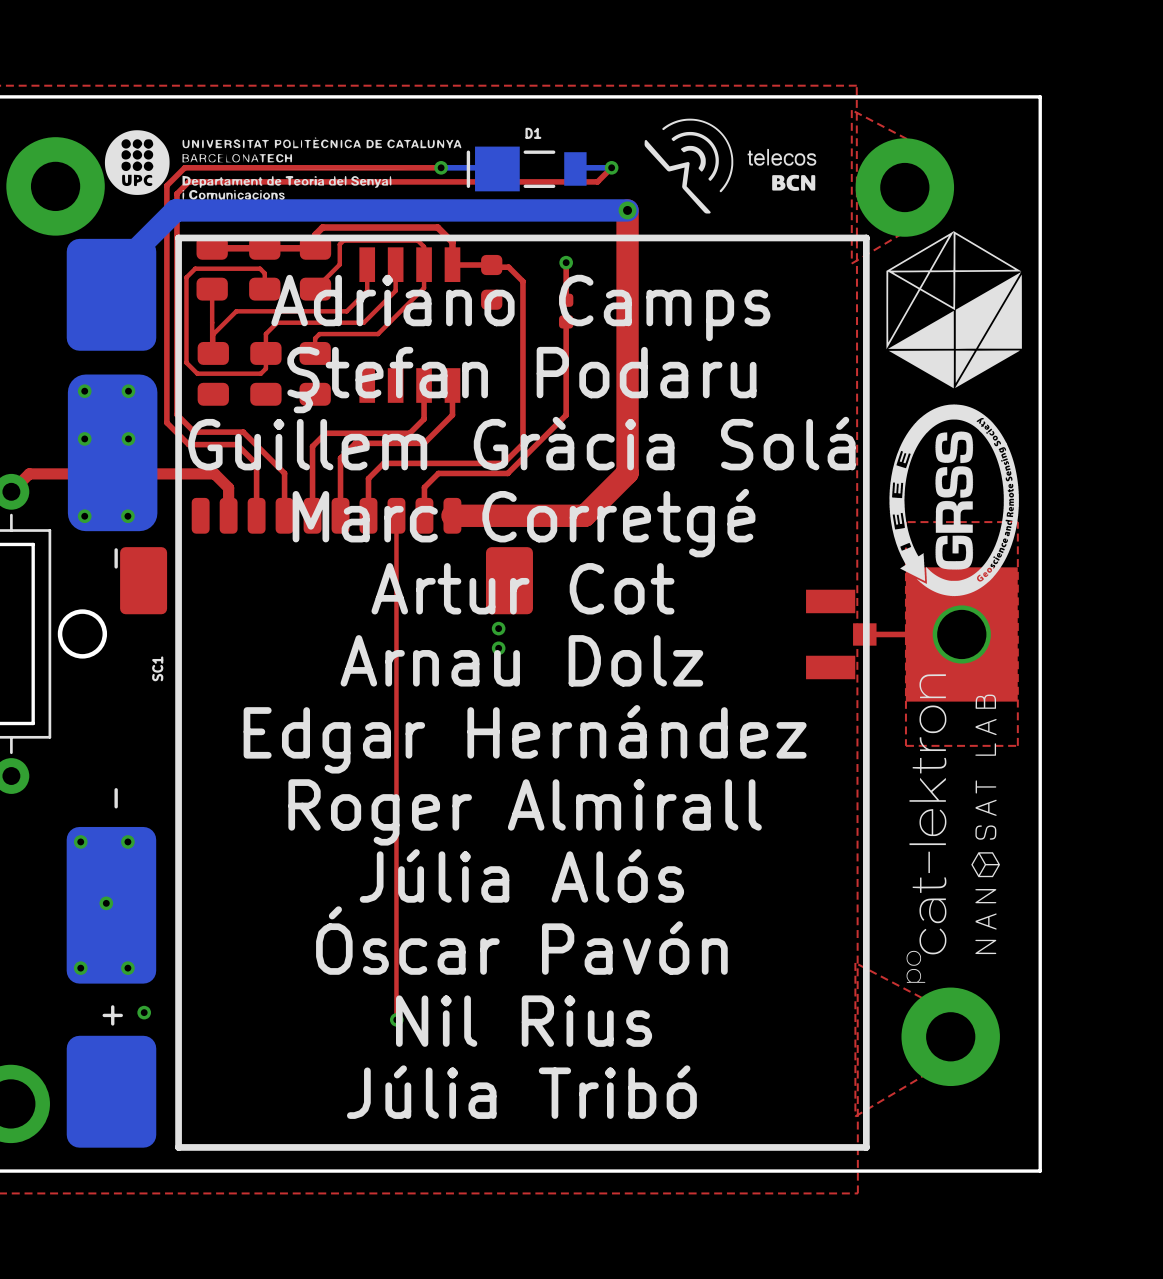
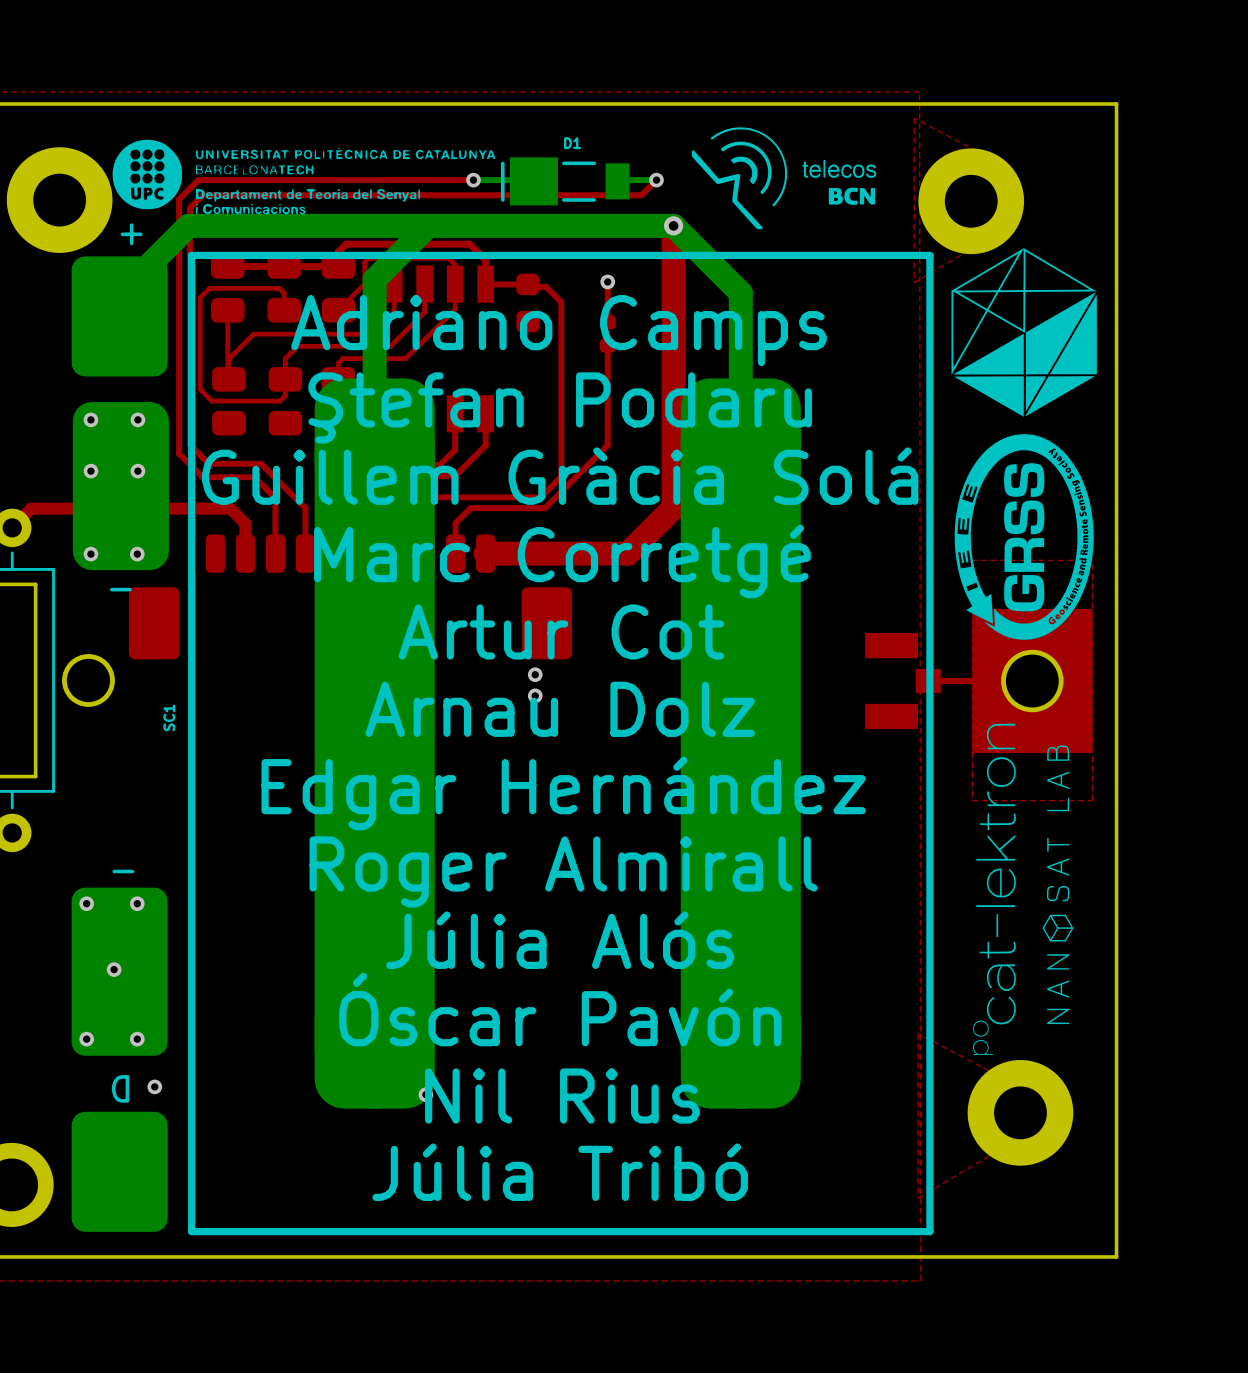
bottom track: none -> (428, 225) (374, 279) (374, 1048)
bottom track: none -> (673, 225) (740, 293) (740, 1048)
text: none -> + (131, 234)
SC1 footprint: [66, 234, 870, 1151] -> [71, 251, 934, 1236]

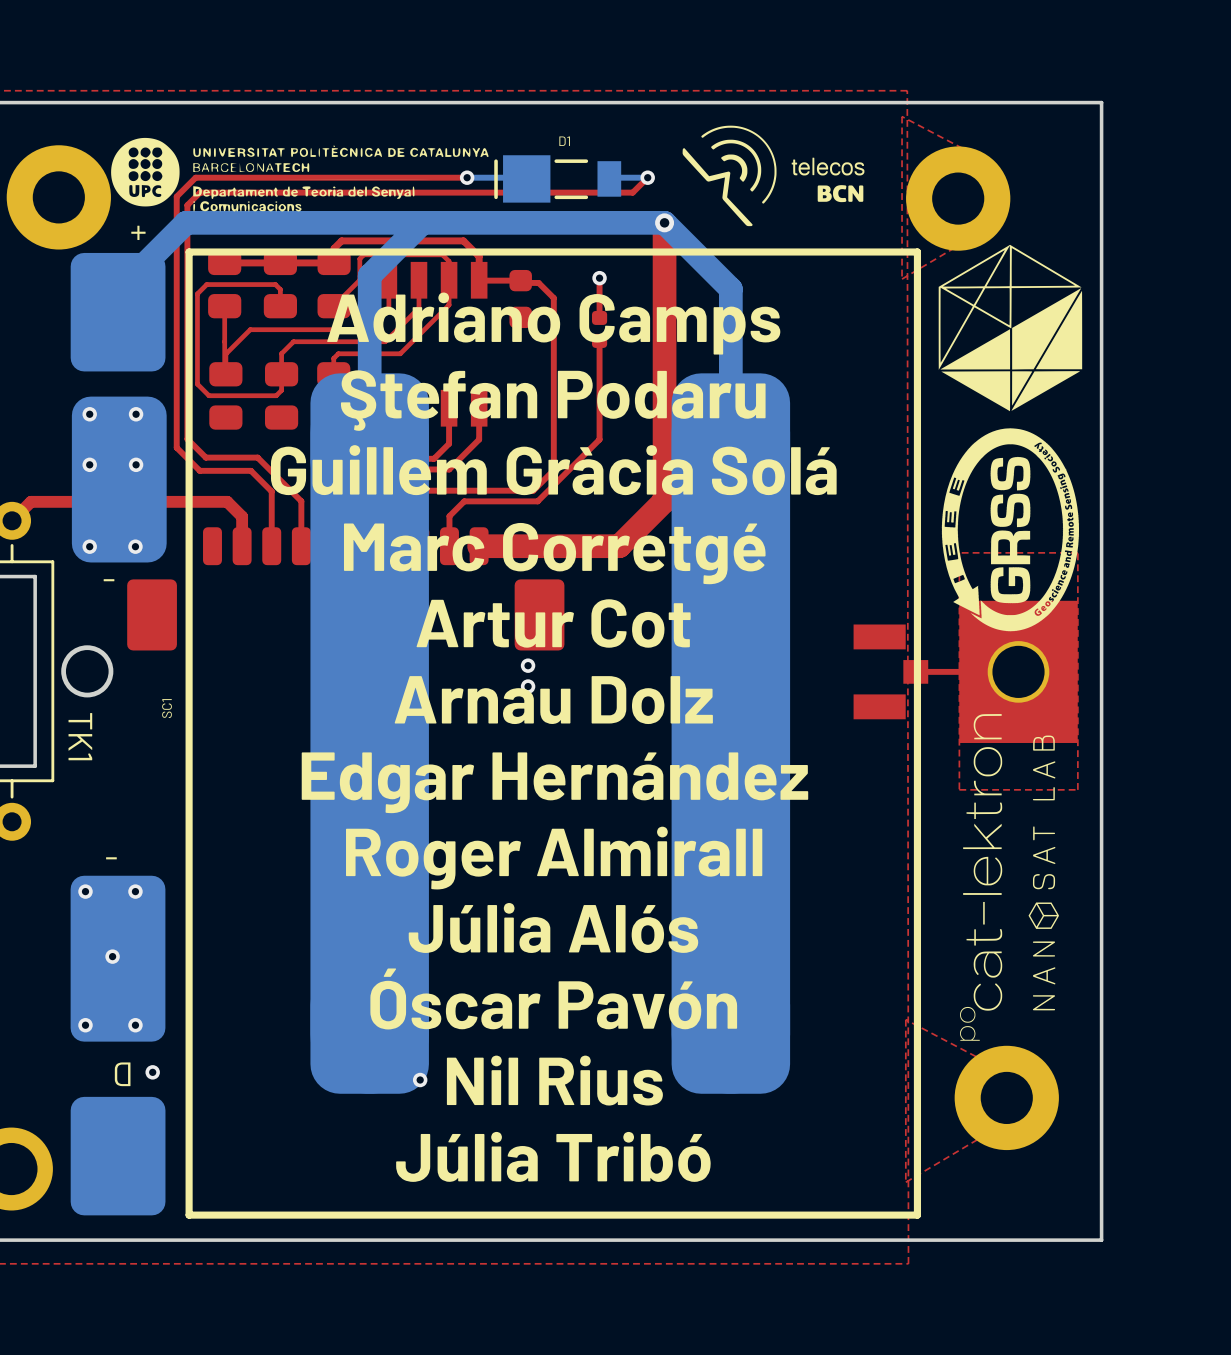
TK1 name: none -> TK1 (80, 736)

